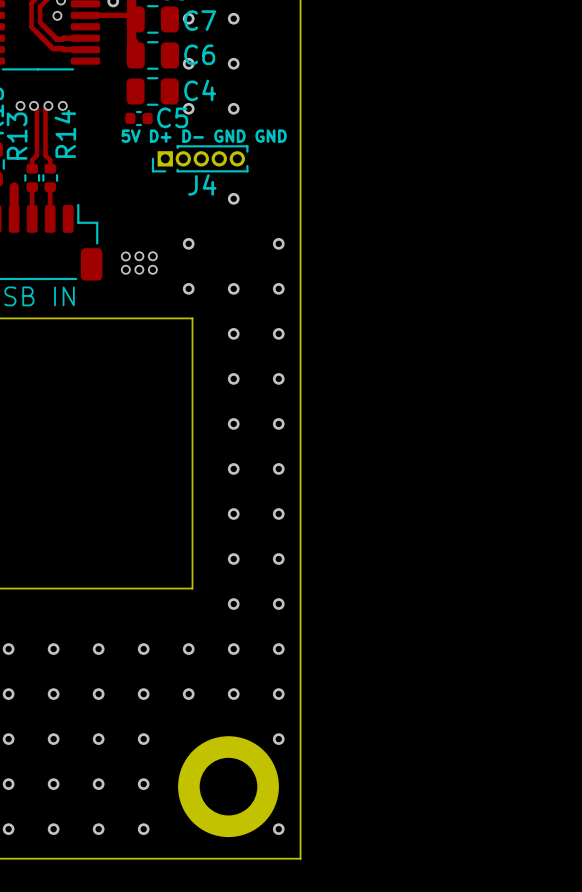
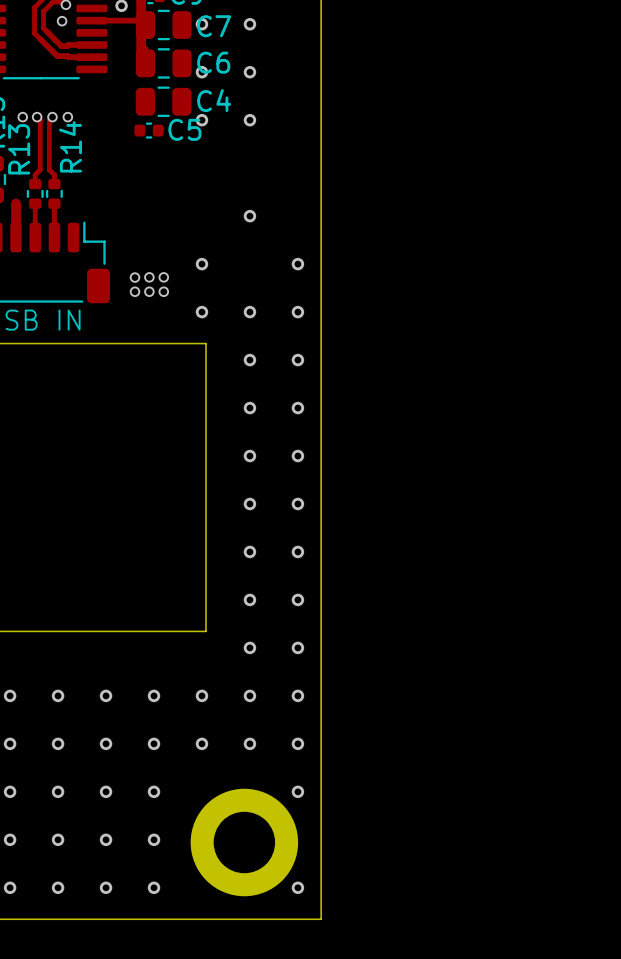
text: 5V D+ D- GND GND (204, 136) -> none
J4: (200, 158) -> none

